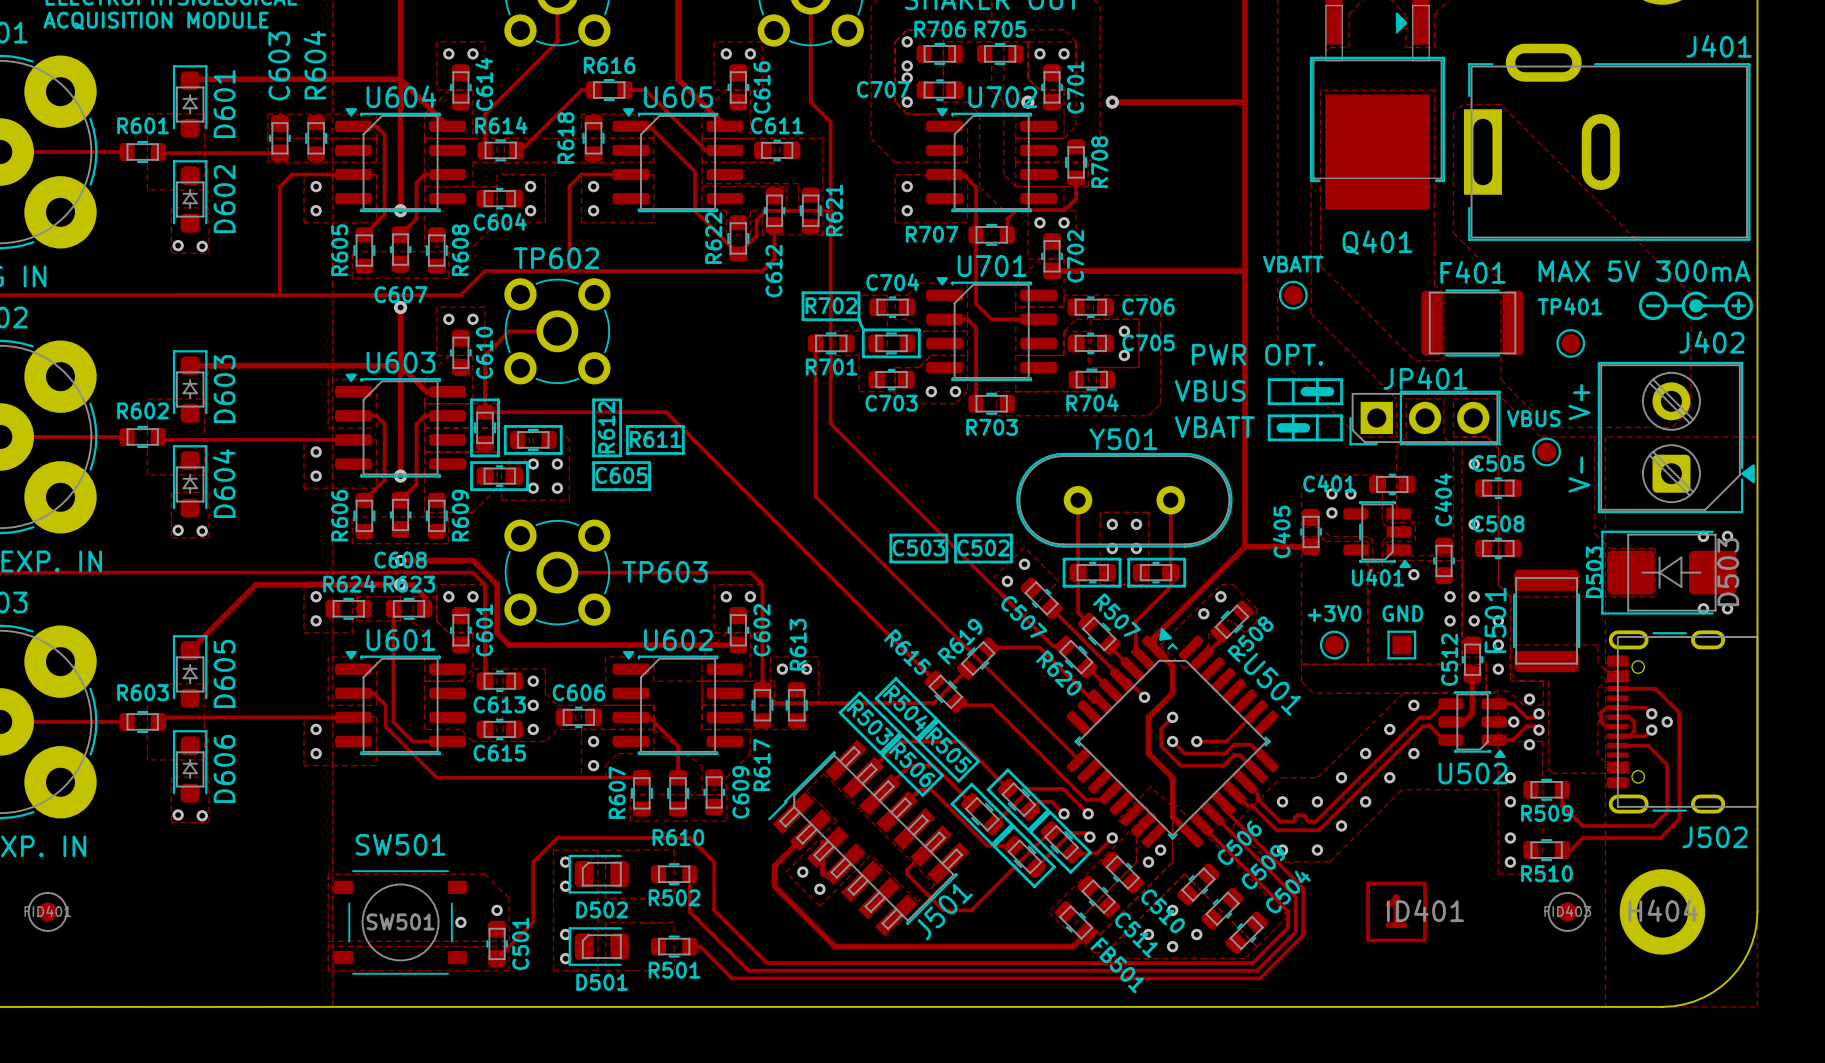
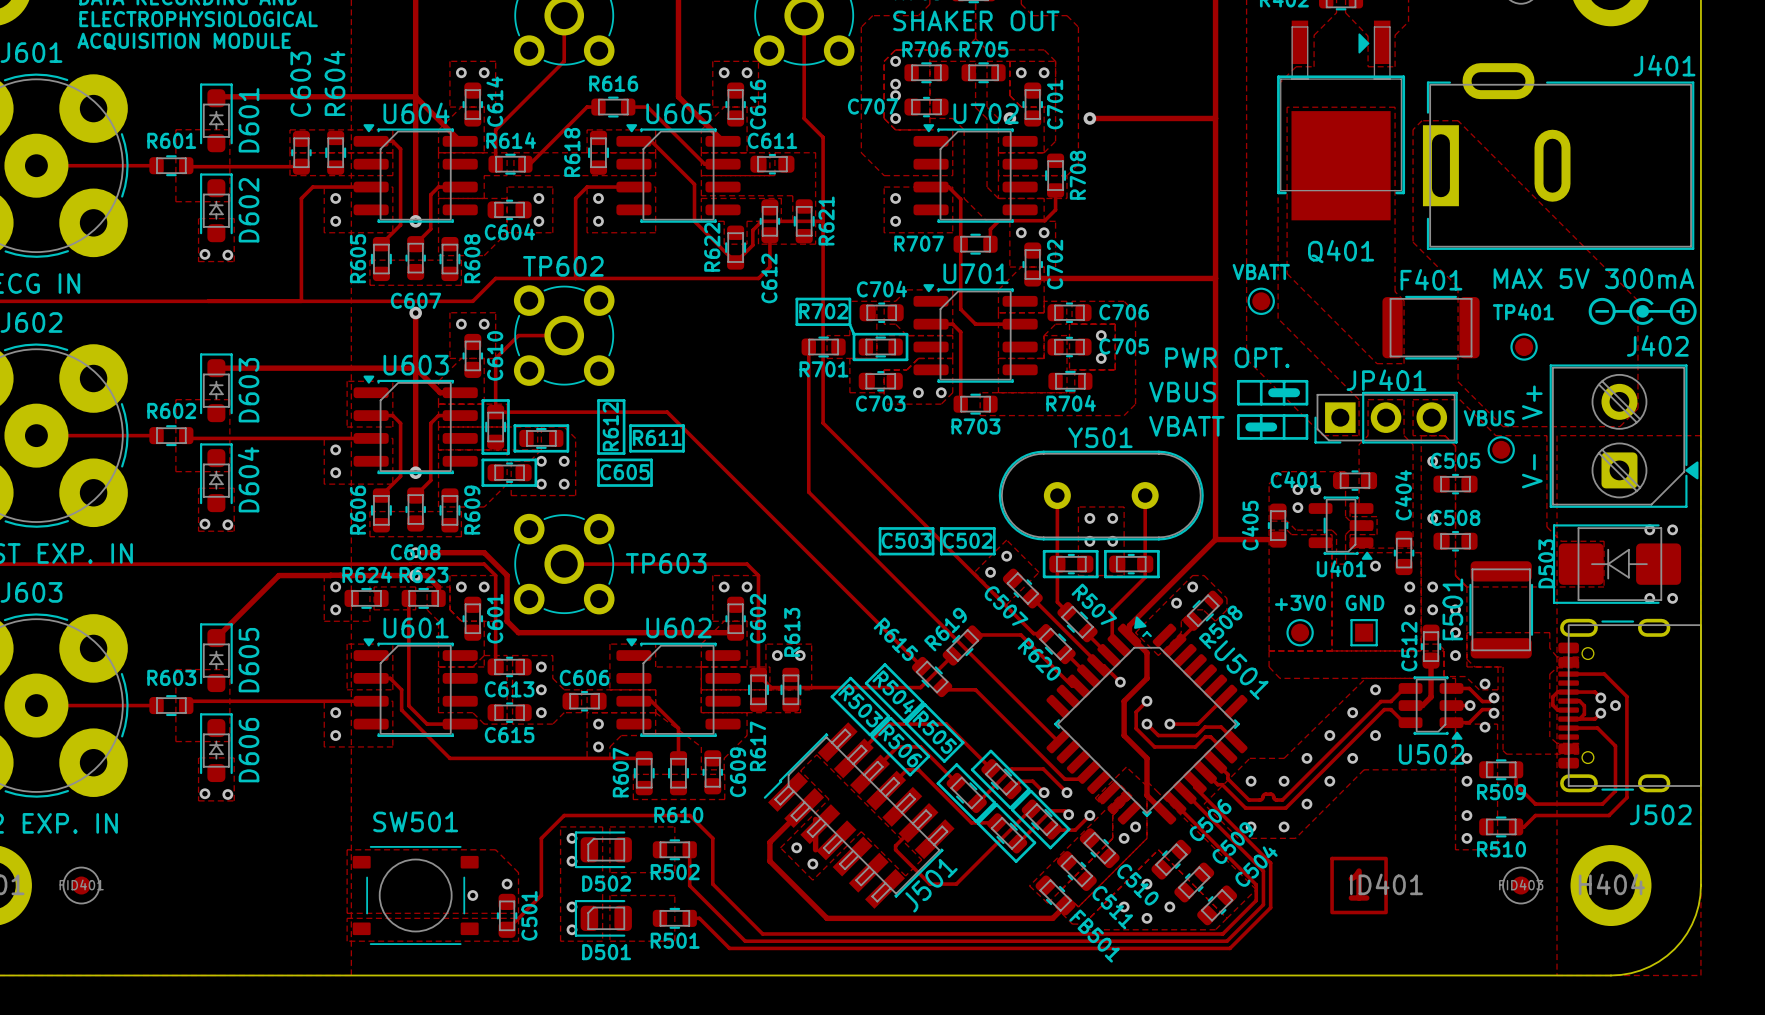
text: D503 (1728, 572) -> none
text: SW501 (400, 921) -> none

